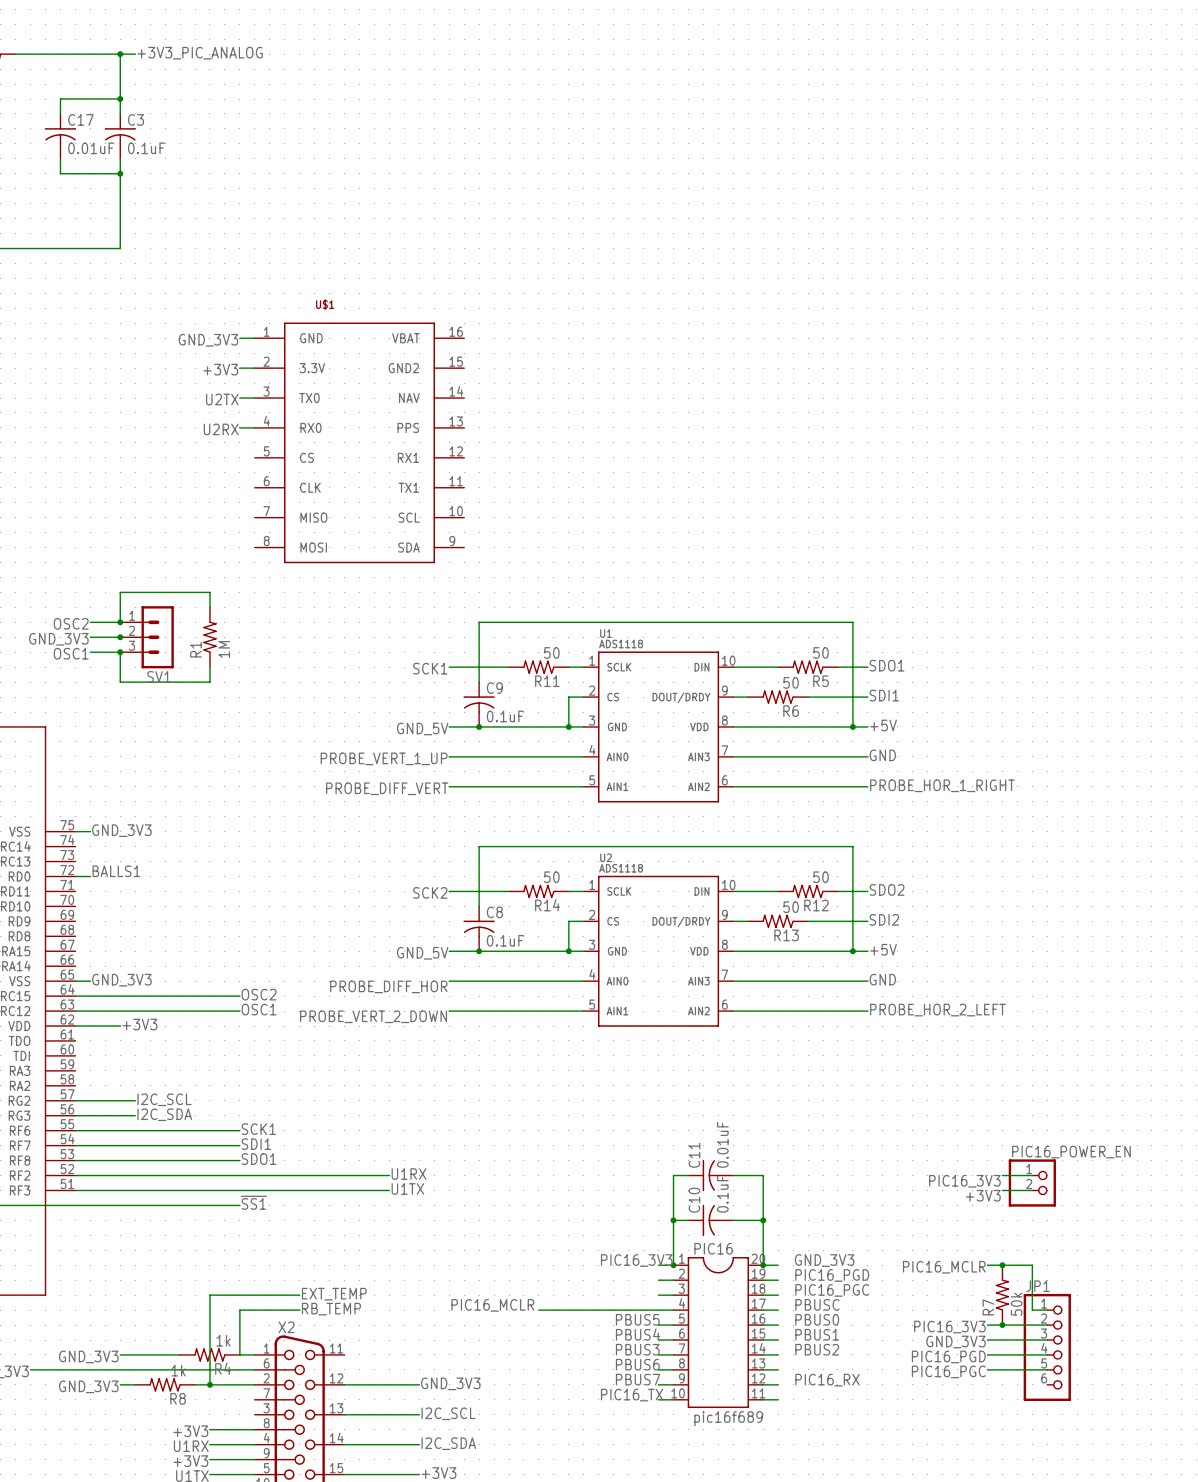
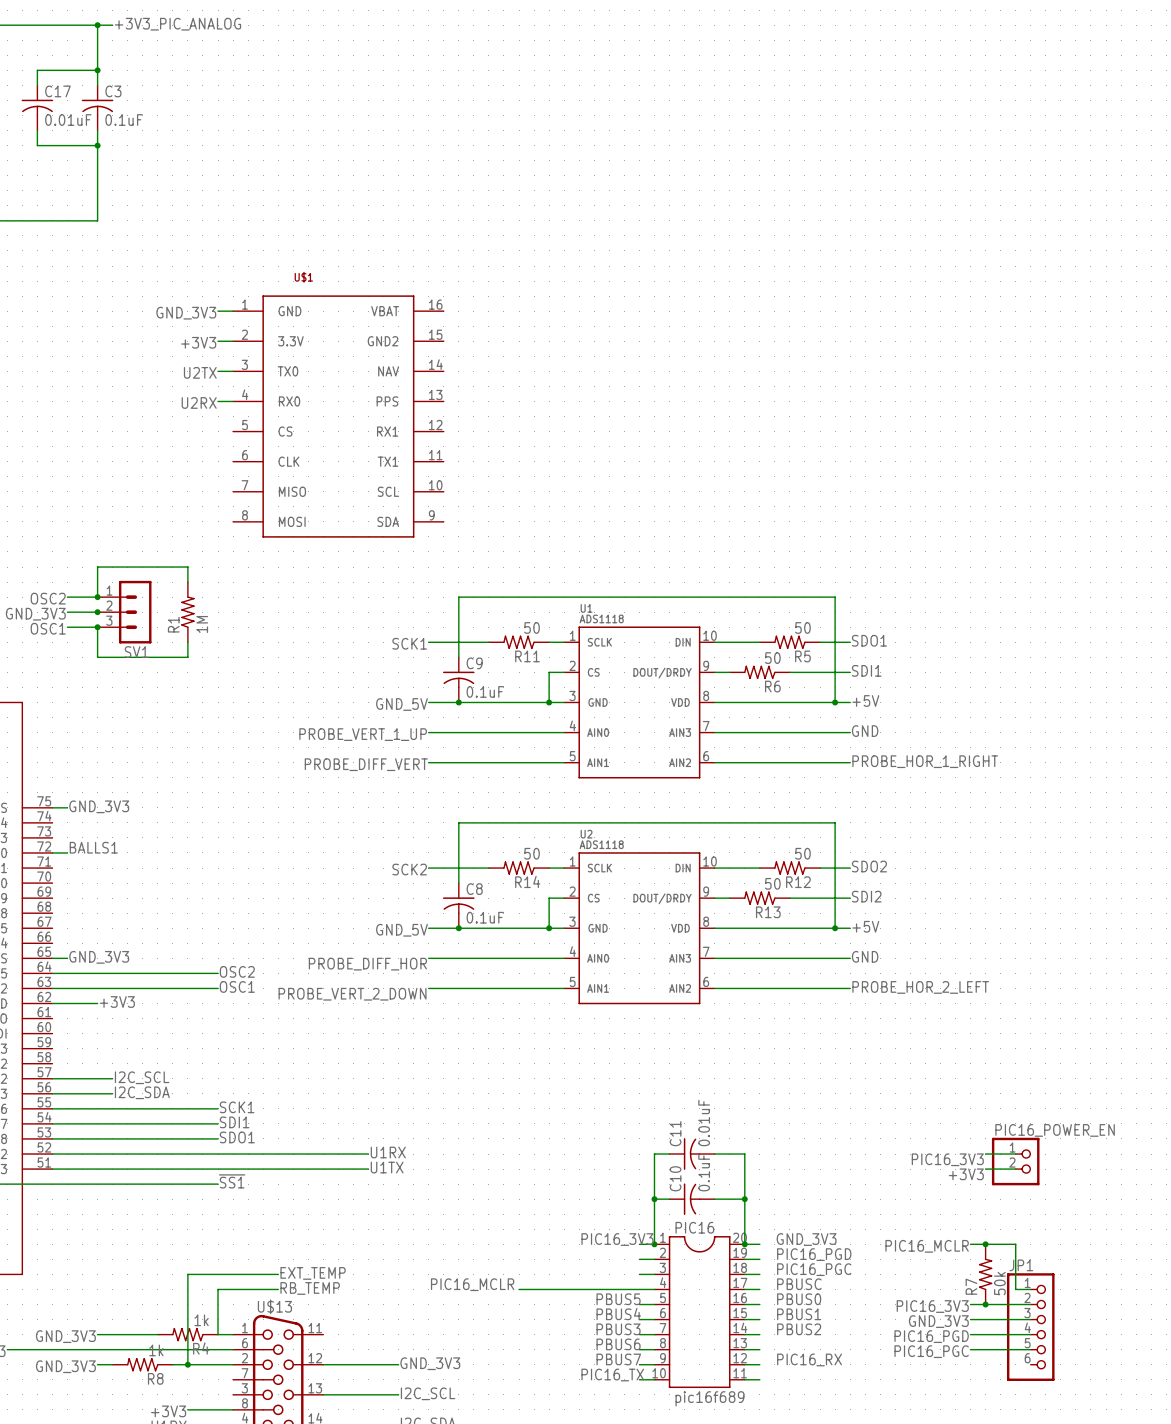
X2 name: X2 (286, 1327) -> U$13 (274, 1306)

